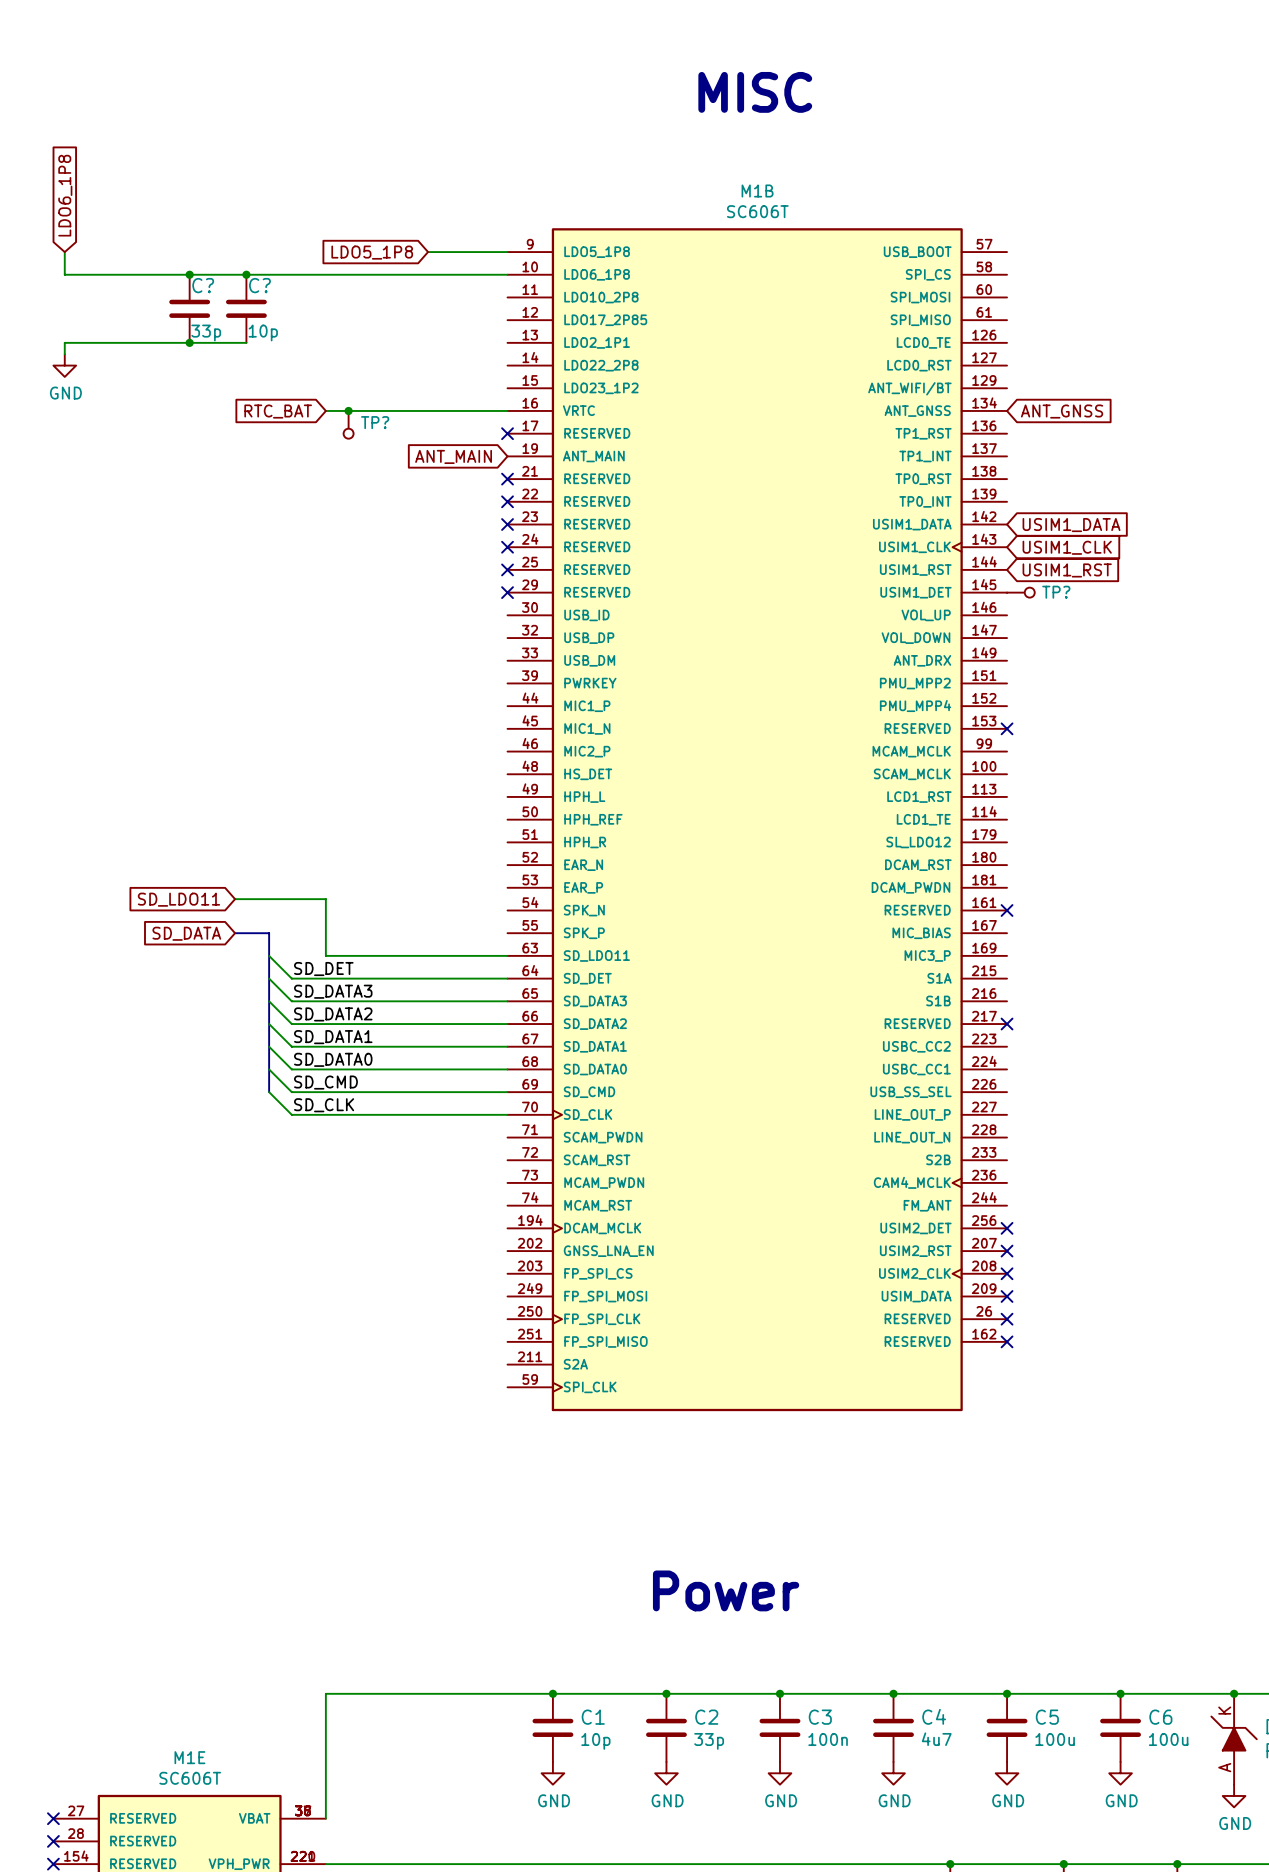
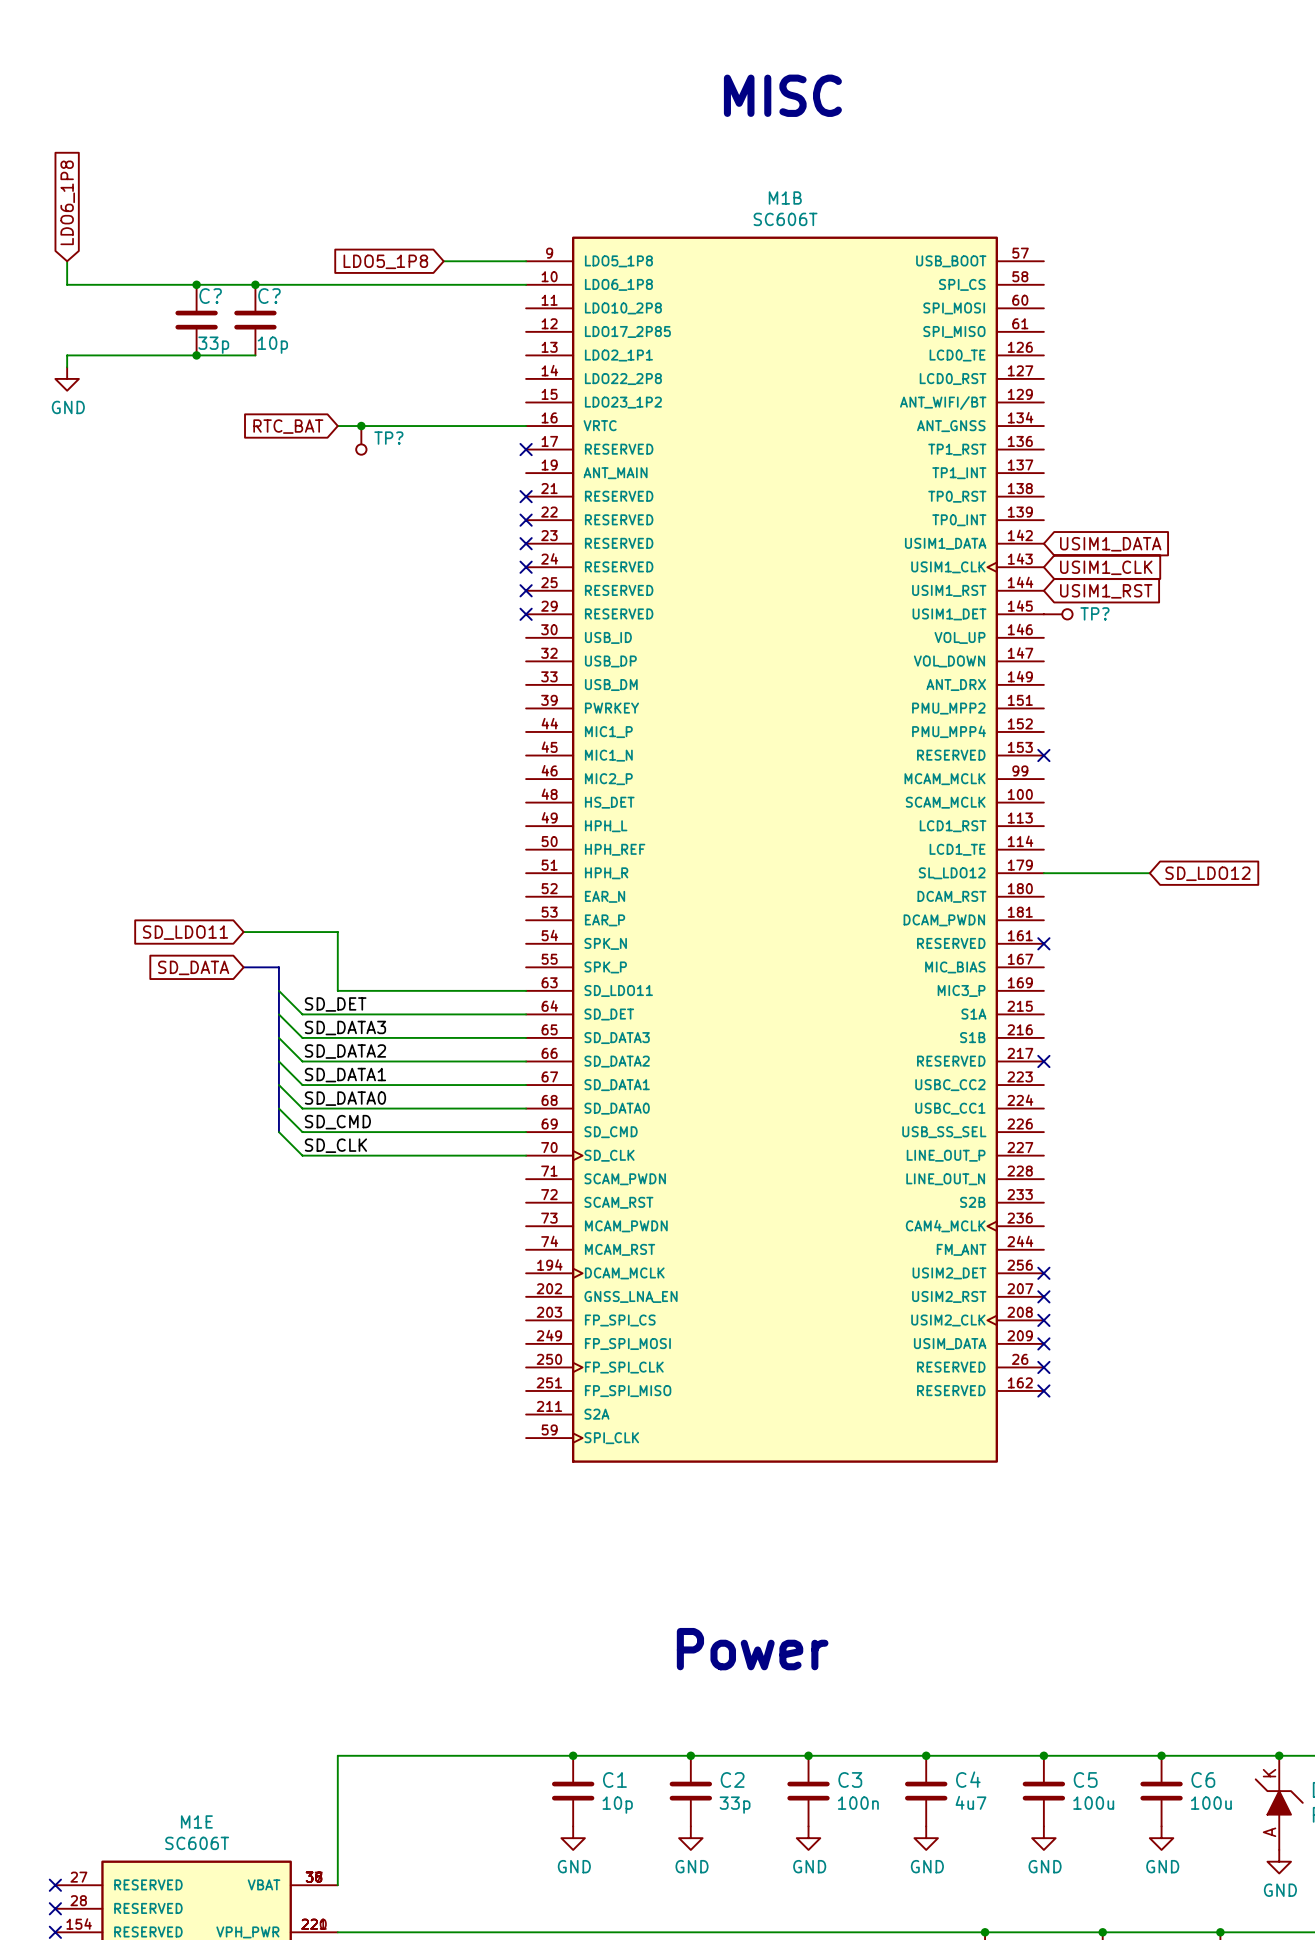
global label: ANT_GNSS (1062, 411) -> none
global label: ANT_MAIN (453, 456) -> none
wire: none -> (1043, 873) (1149, 873)
global label: none -> SD_LDO12 (1207, 873)

